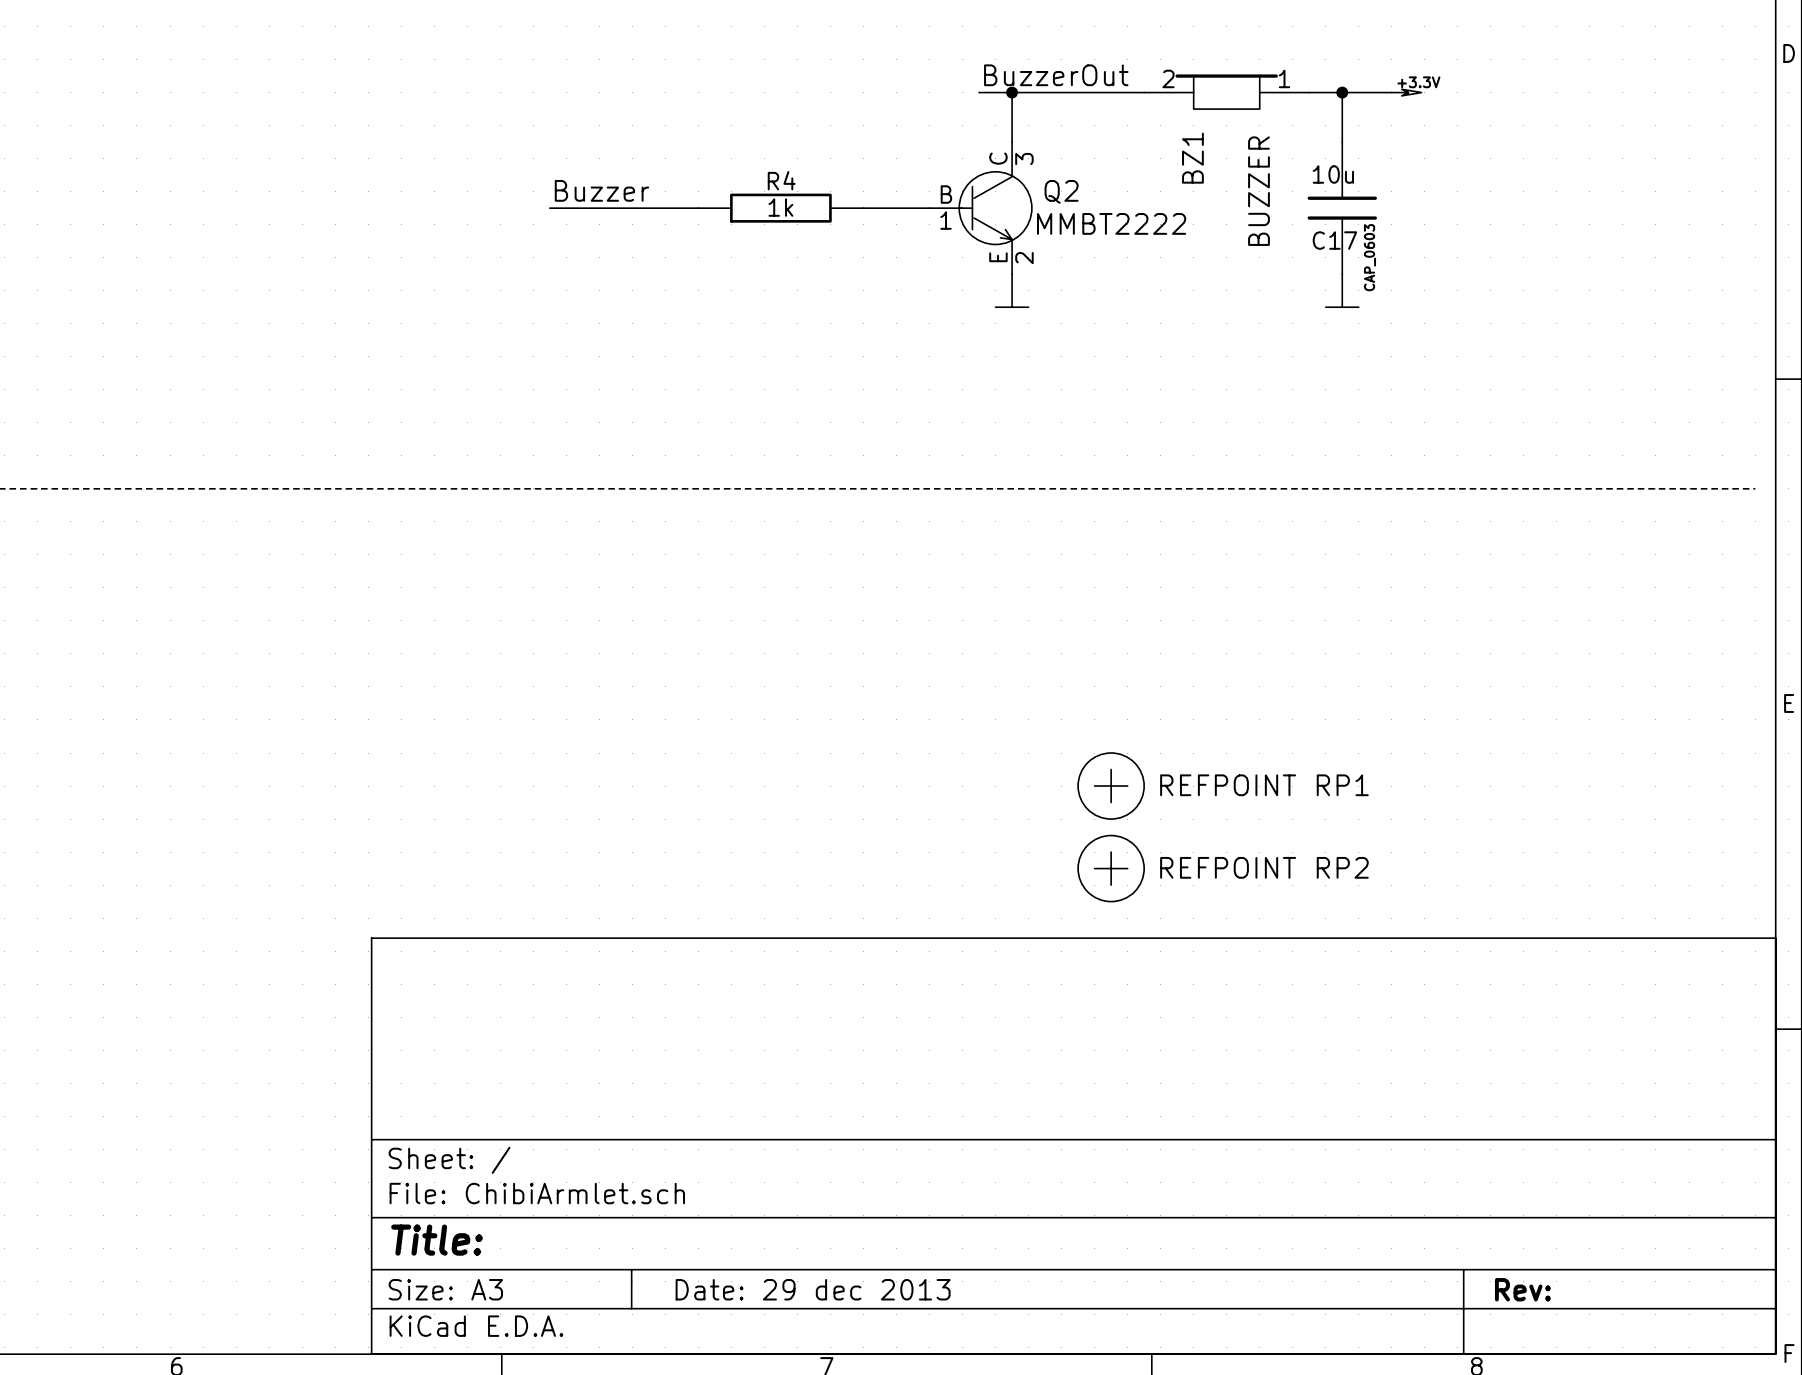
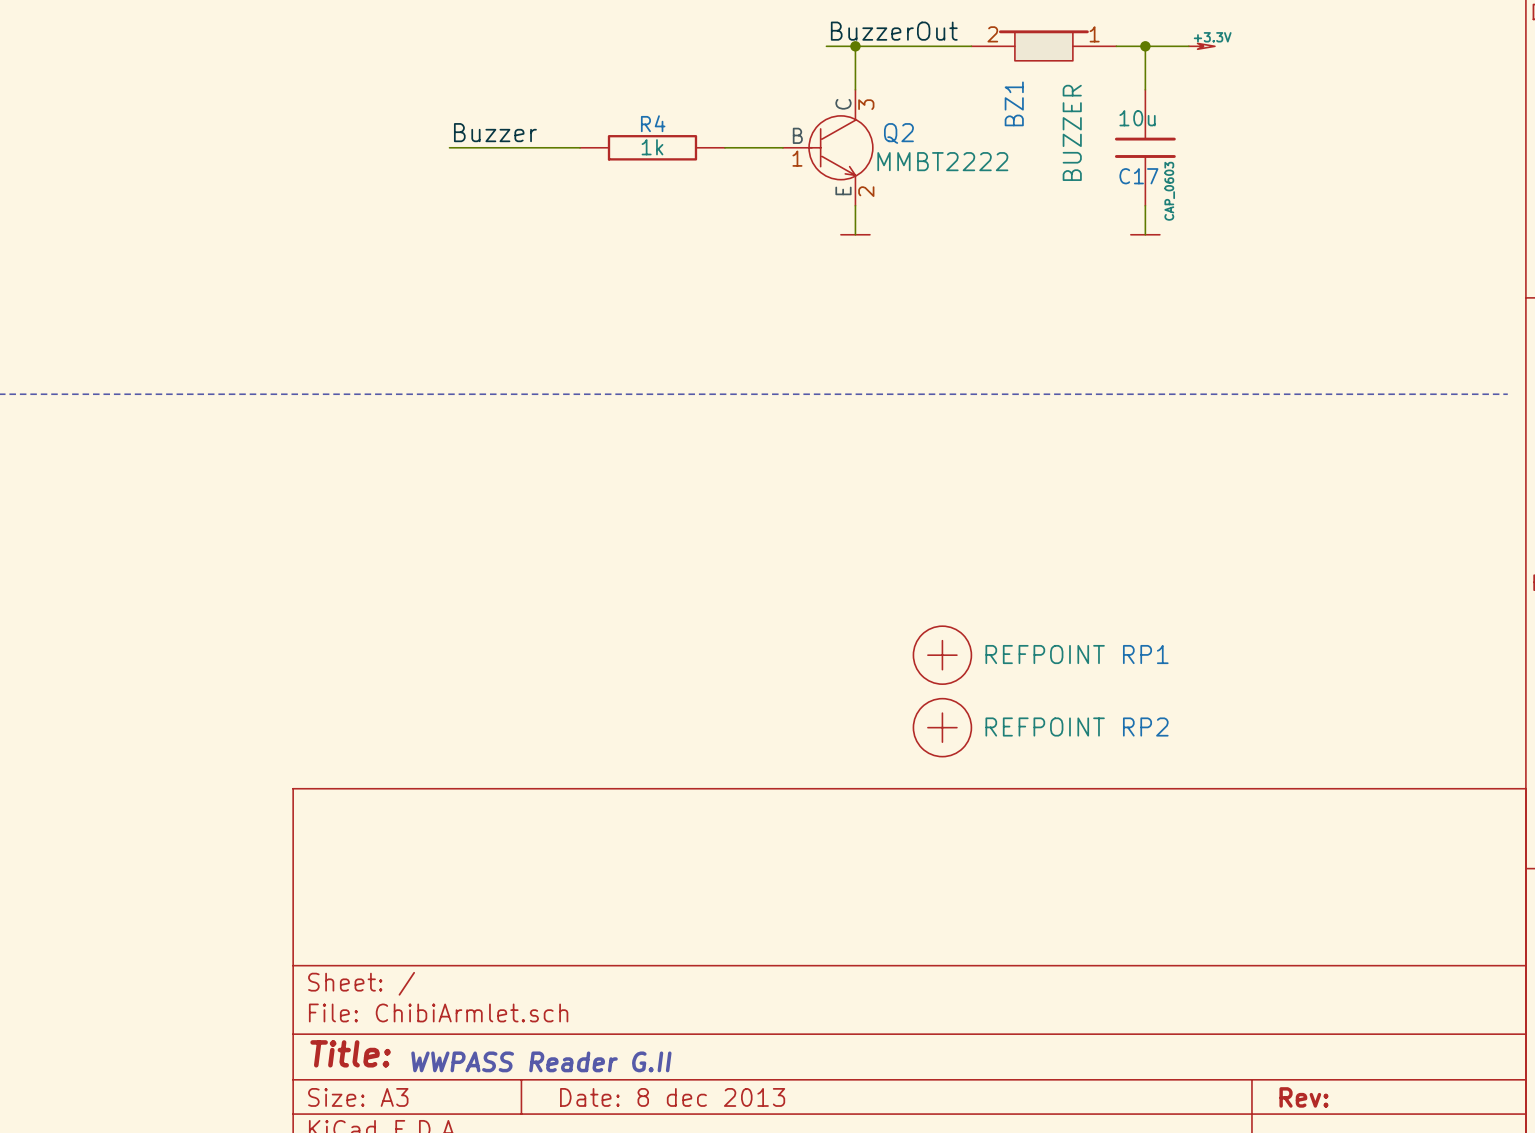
text: none -> WWPASS Reader G.II (541, 1061)
title block: Date: 29 dec 2013 (813, 1289) -> Date: 8 dec 2013 (672, 1097)

